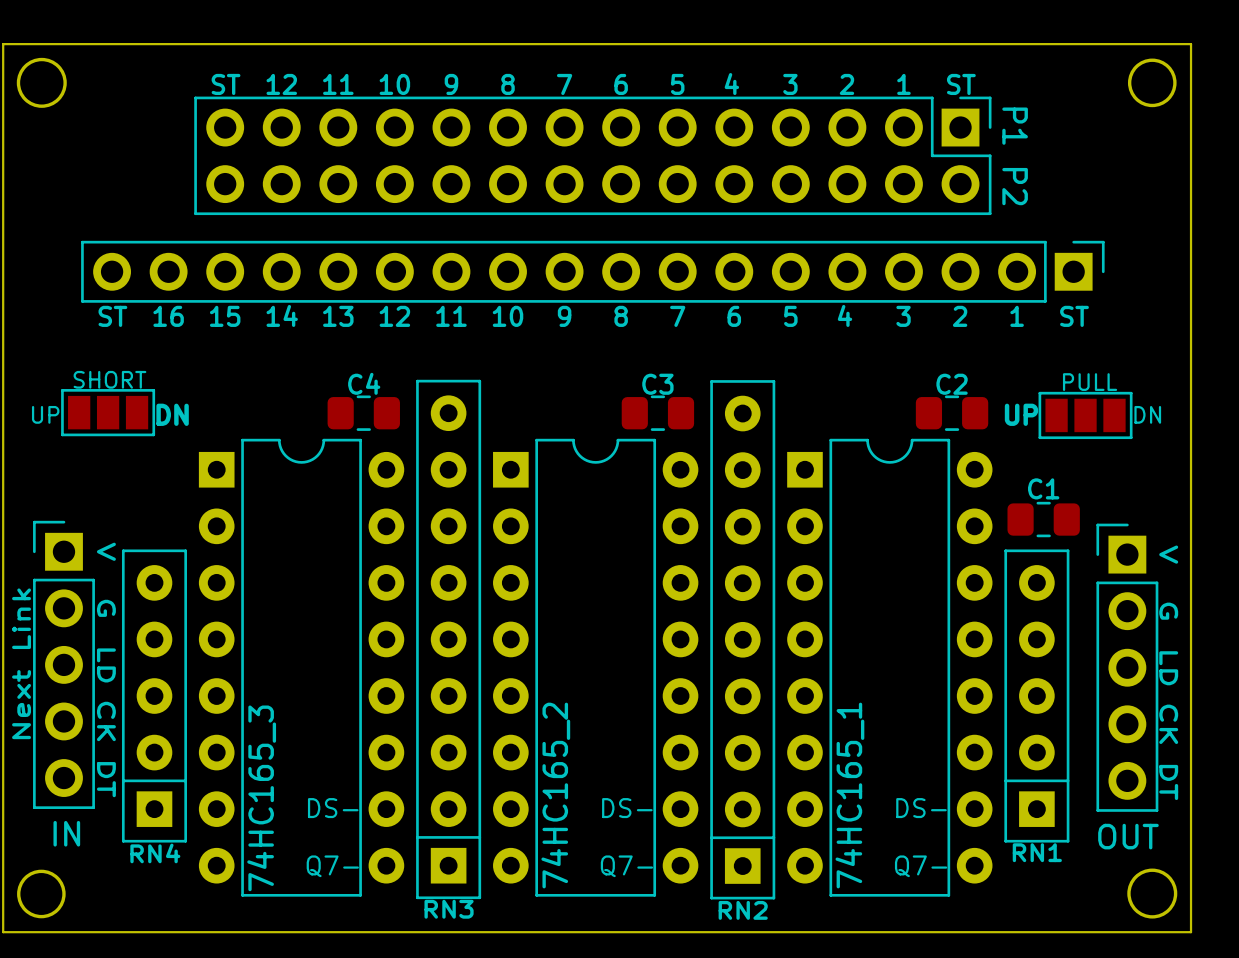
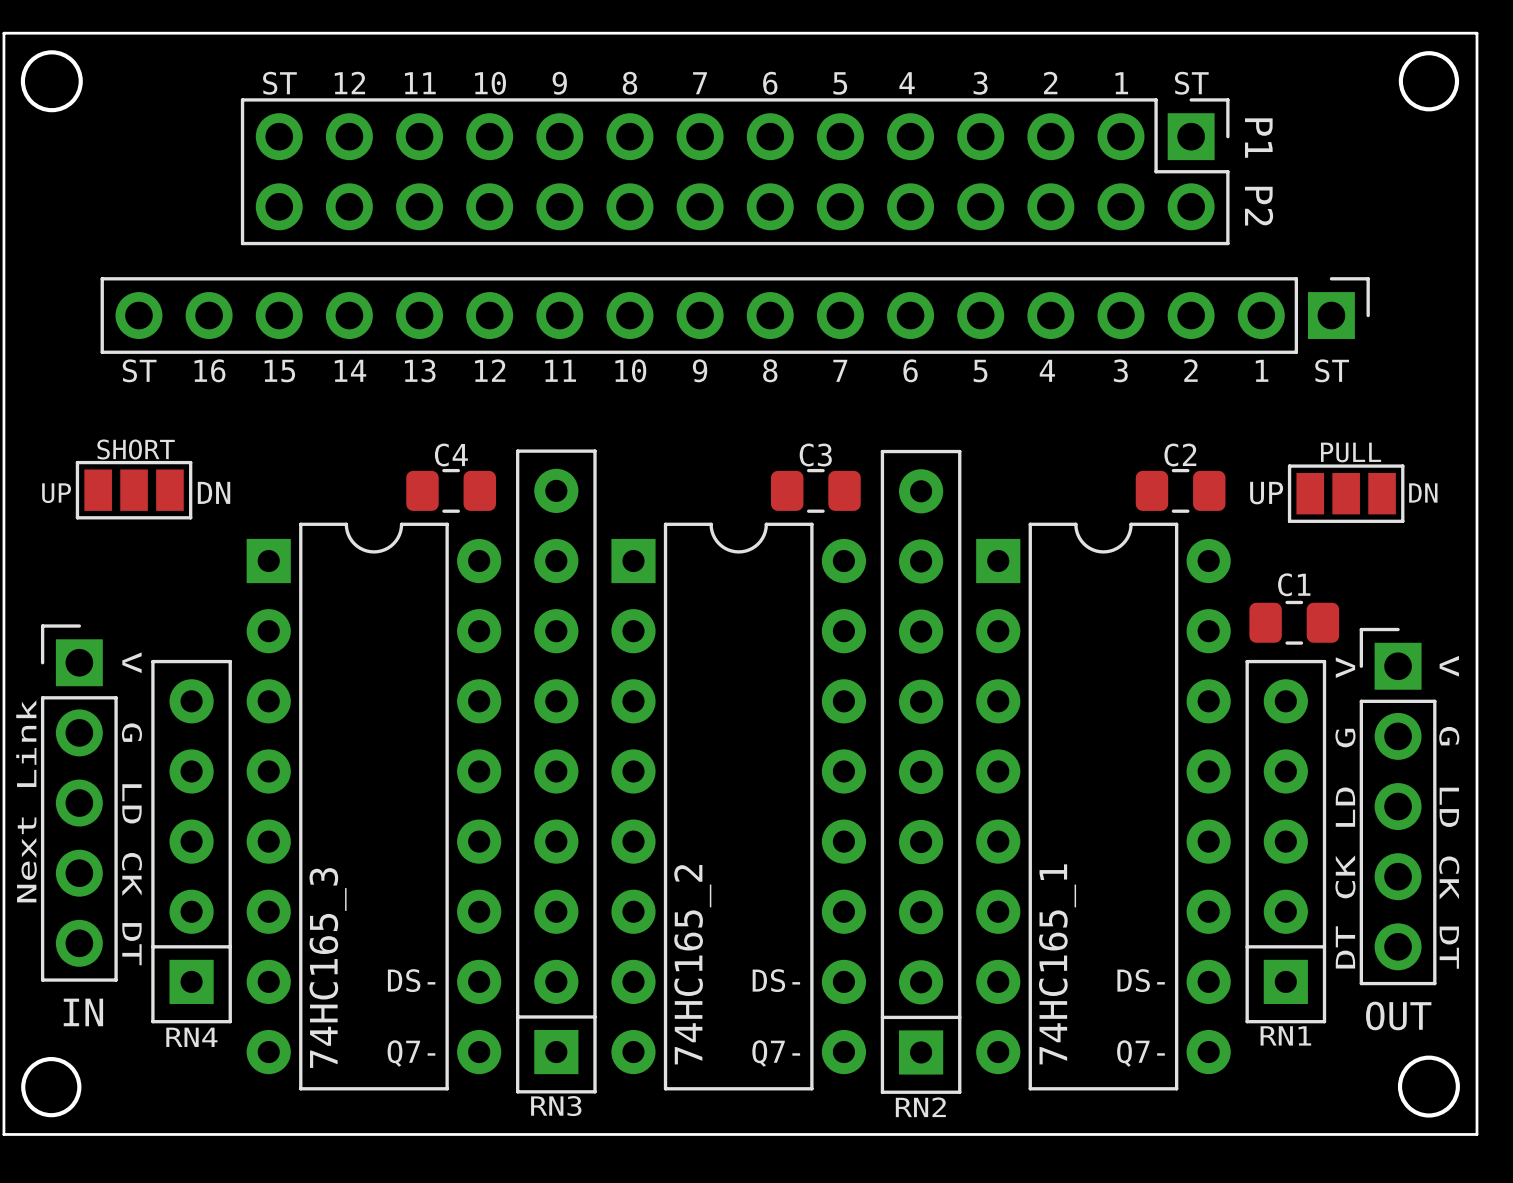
text: none -> V (1345, 667)
text: none -> G (1345, 738)
text: none -> LD (1345, 807)
text: none -> CK (1345, 876)
text: none -> DT (1345, 947)

